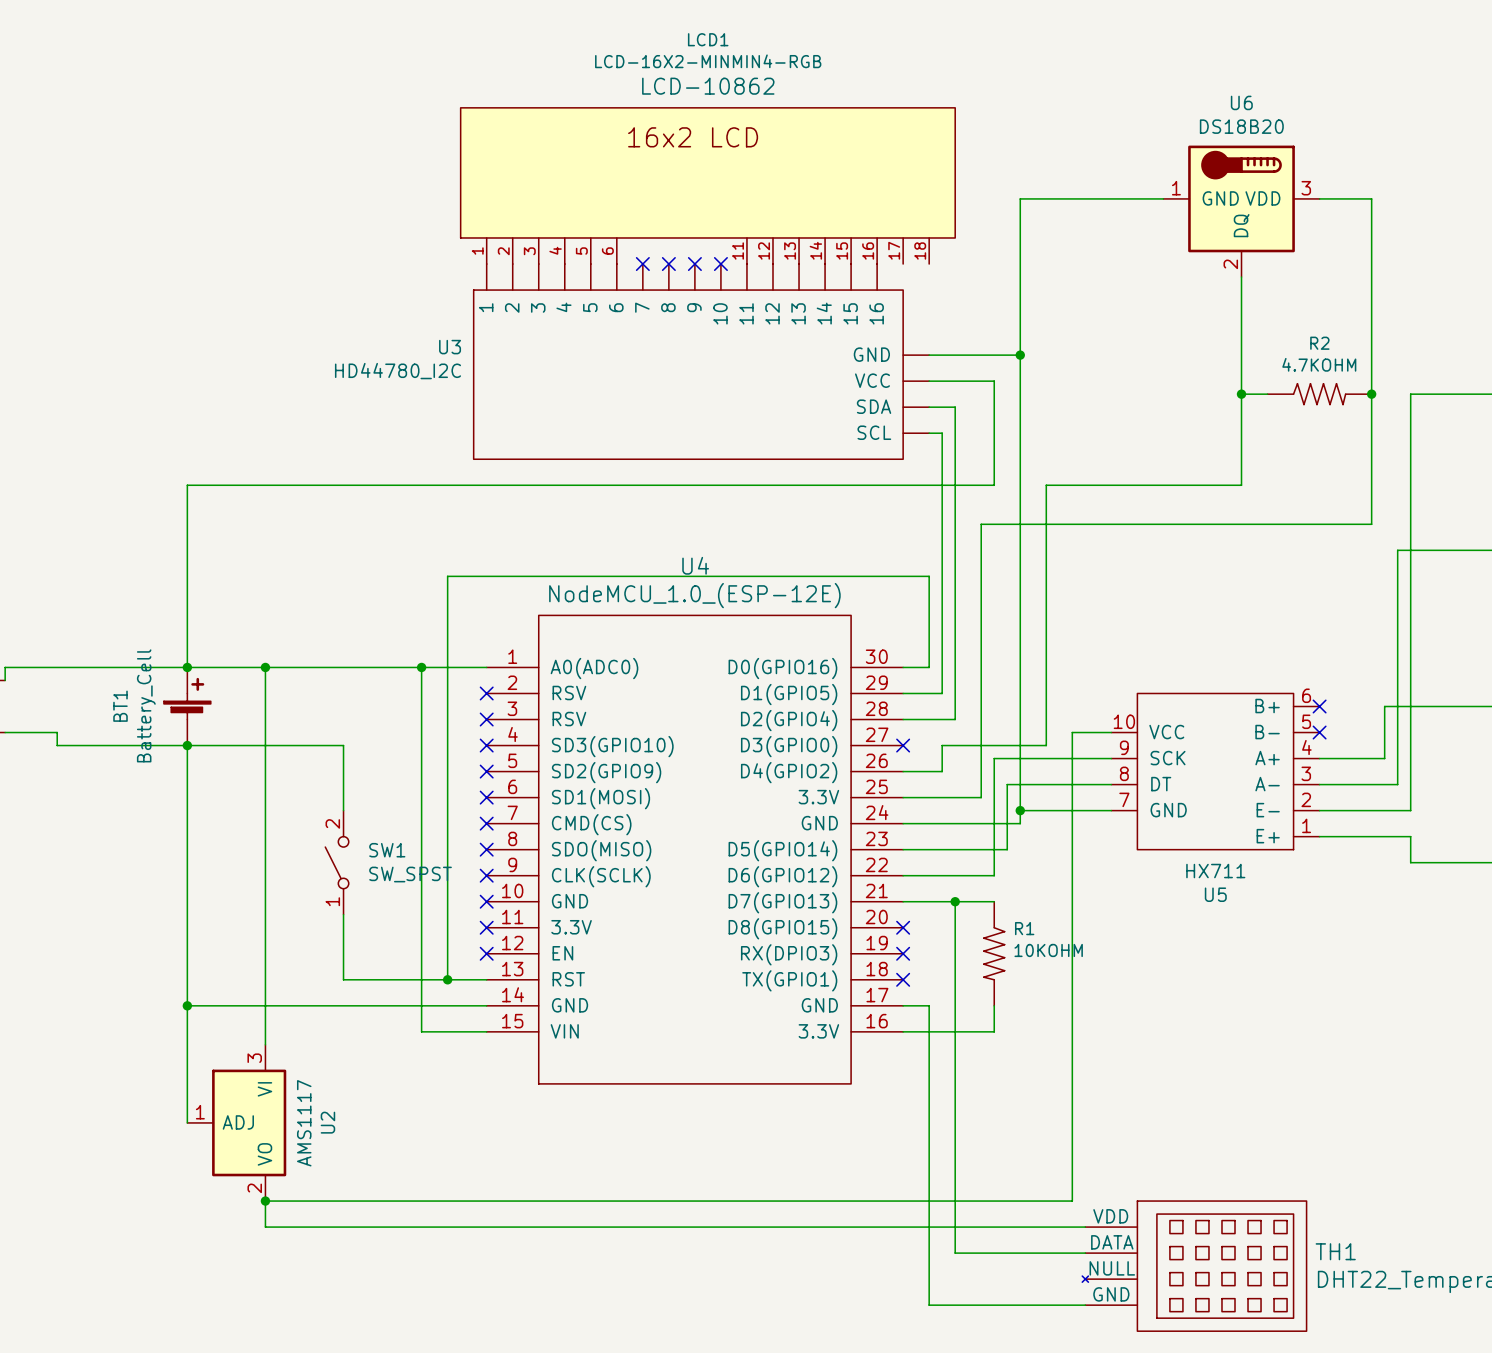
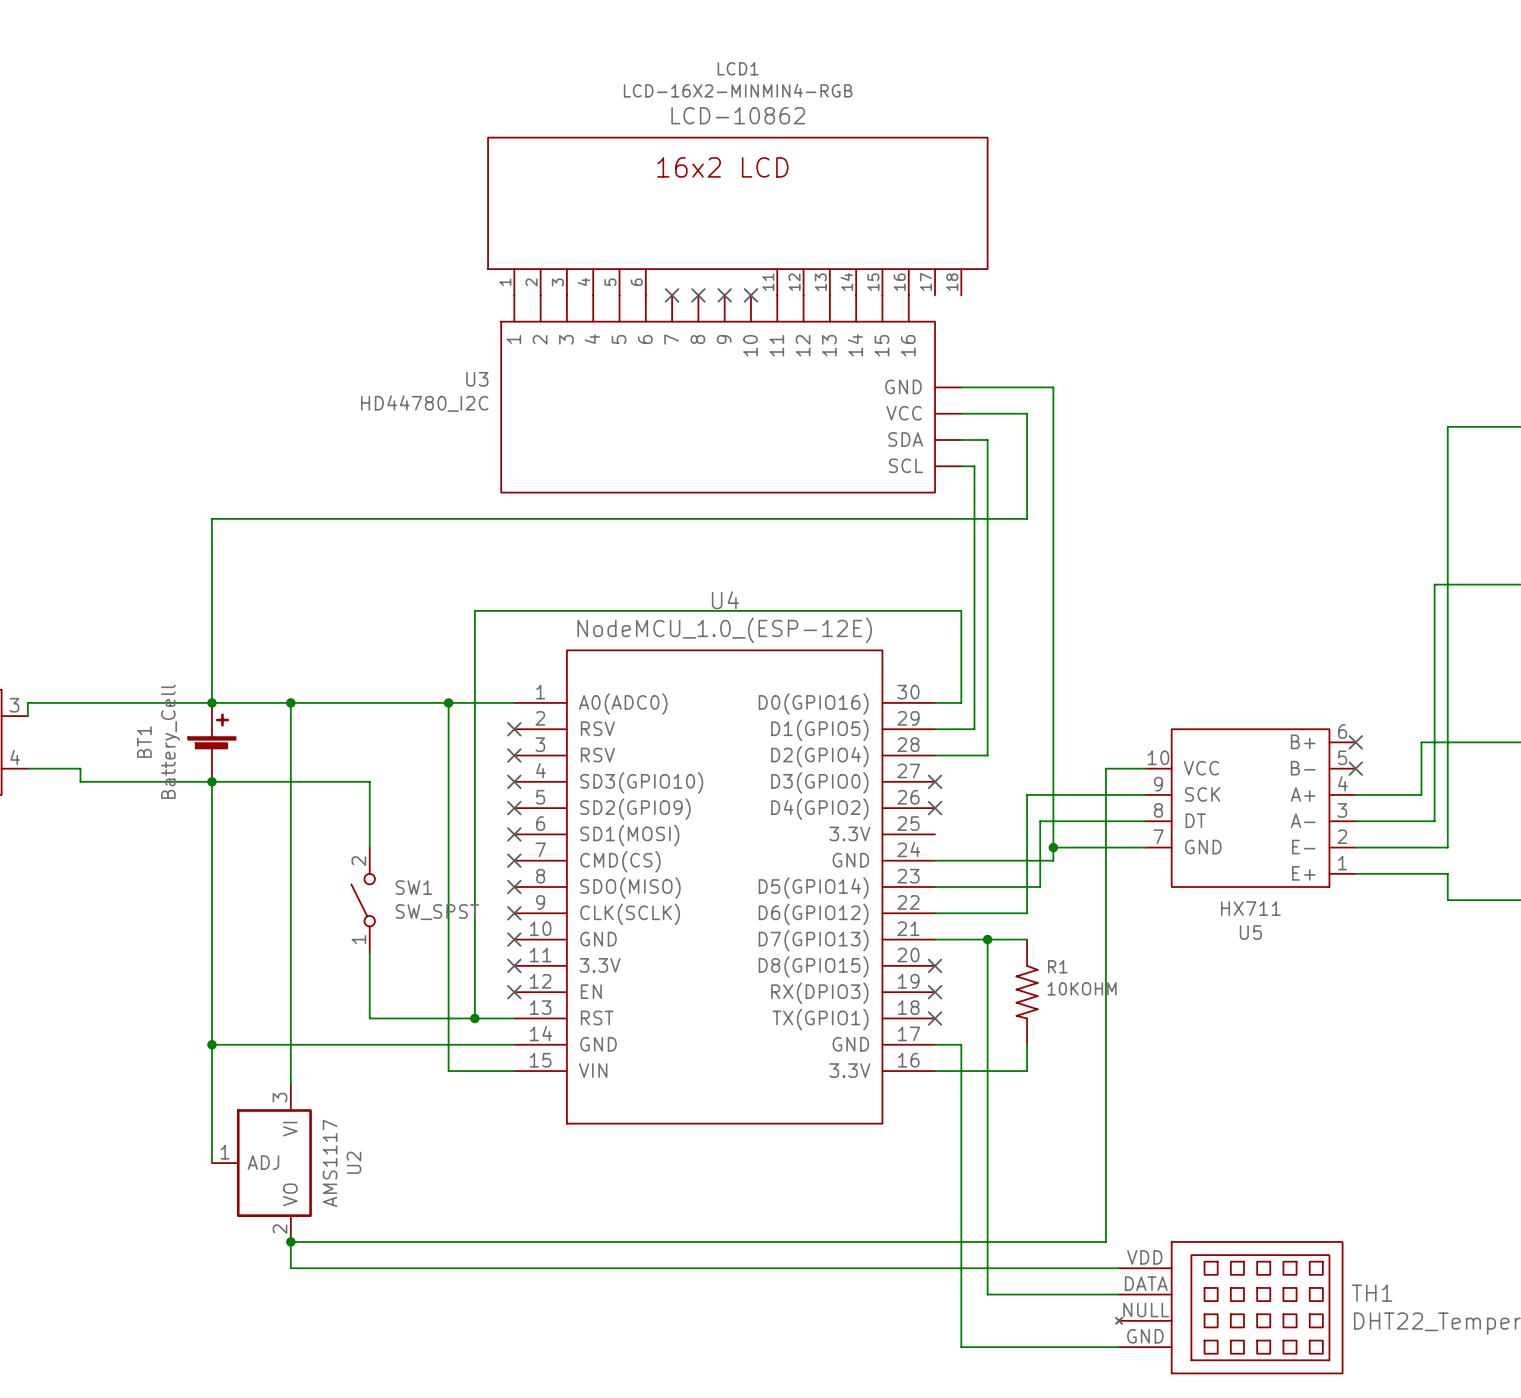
wire: (1163, 198) (1020, 198) (1020, 355) -> none
wire: (1319, 198) (1371, 198) (1371, 524) (981, 524) (981, 797) (903, 797) -> none
U6: DS18B20 (1241, 211) -> none
wire: (1241, 277) (1241, 485) (1046, 485) (1046, 745) (942, 745) (942, 771) (903, 771) -> none
junction: (1020, 355) -> none
wire: (1241, 394) (1267, 394) -> none
junction: (1241, 394) -> none
R2: 4.7KOHM (1319, 394) -> none
junction: (1371, 394) -> none
no-connect mark: none -> (935, 808)

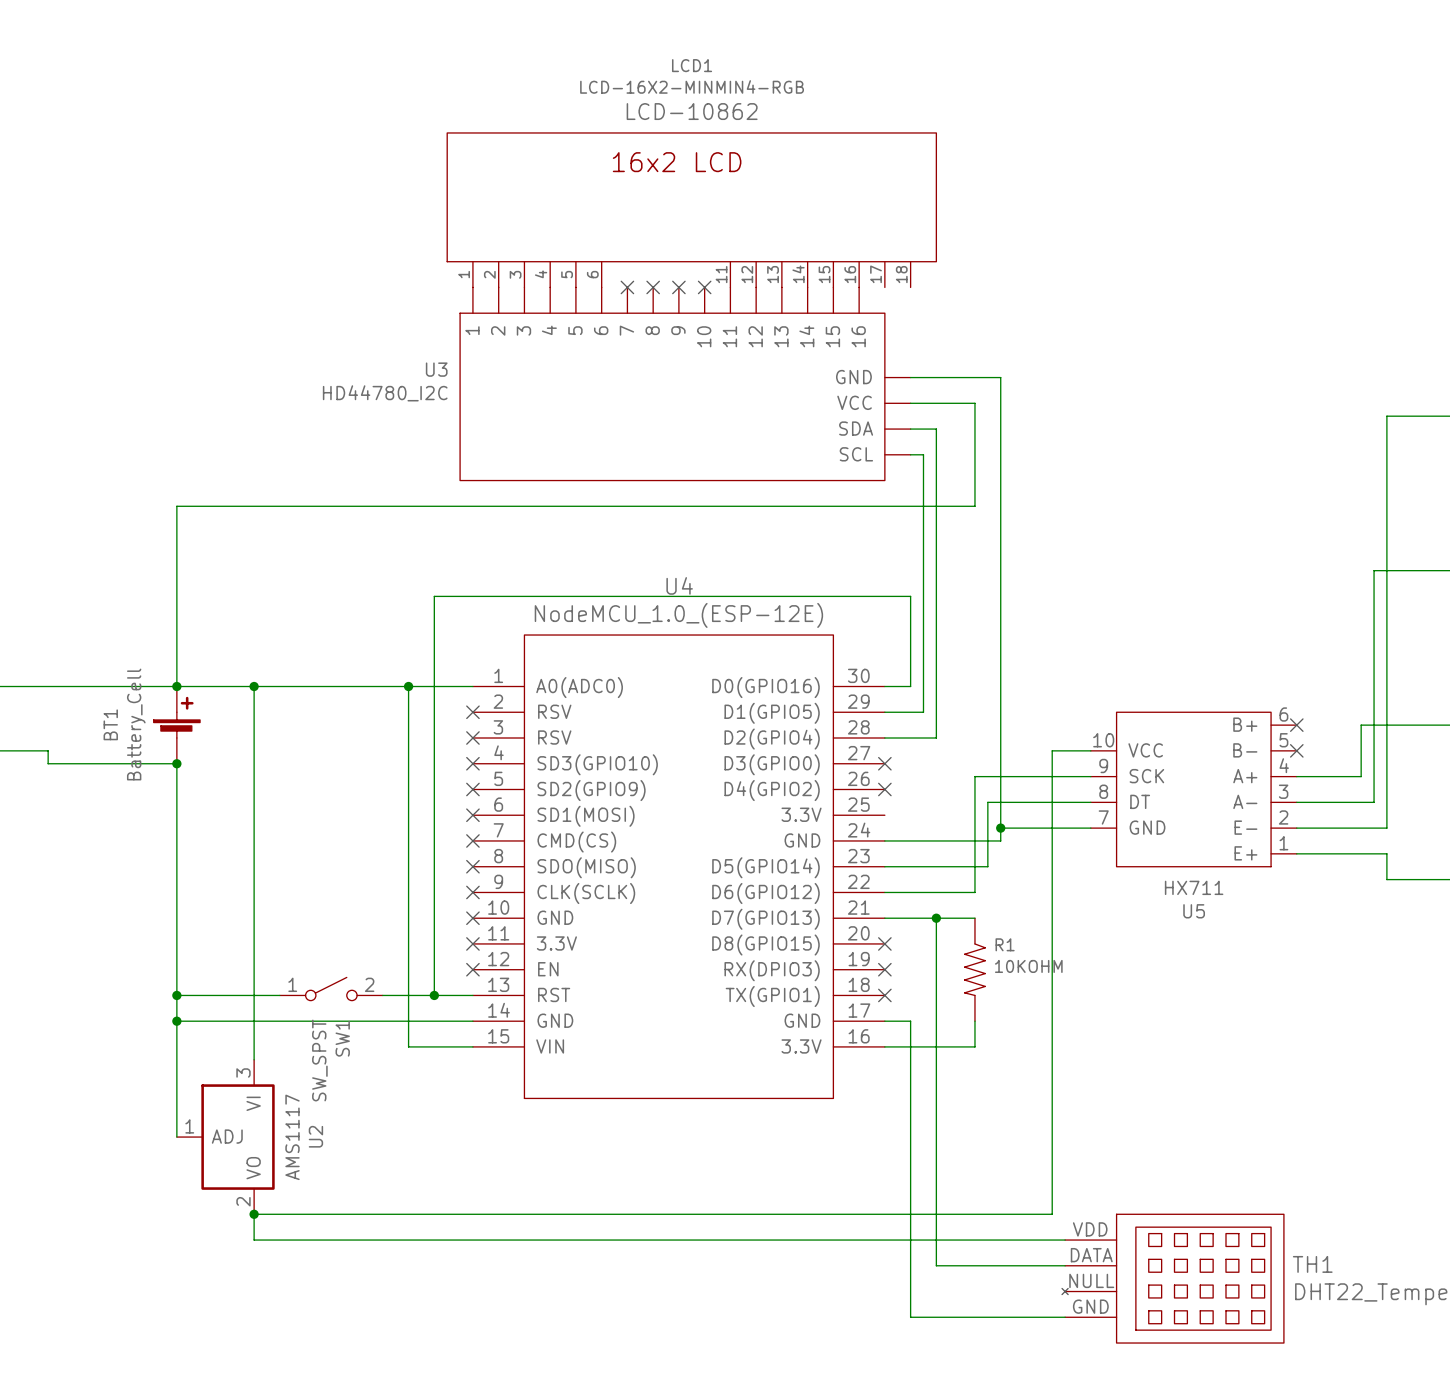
wire: (211, 781) (369, 781) (369, 847) -> none
SW1 rotation: 0° (363, 900) -> 90° clockwise (331, 989)
SW1 position: (363, 900) -> (331, 989)
wire: (369, 952) (369, 1018) (422, 1018) -> none
wire: none -> (176, 995) (279, 995)
junction: none -> (176, 995)

